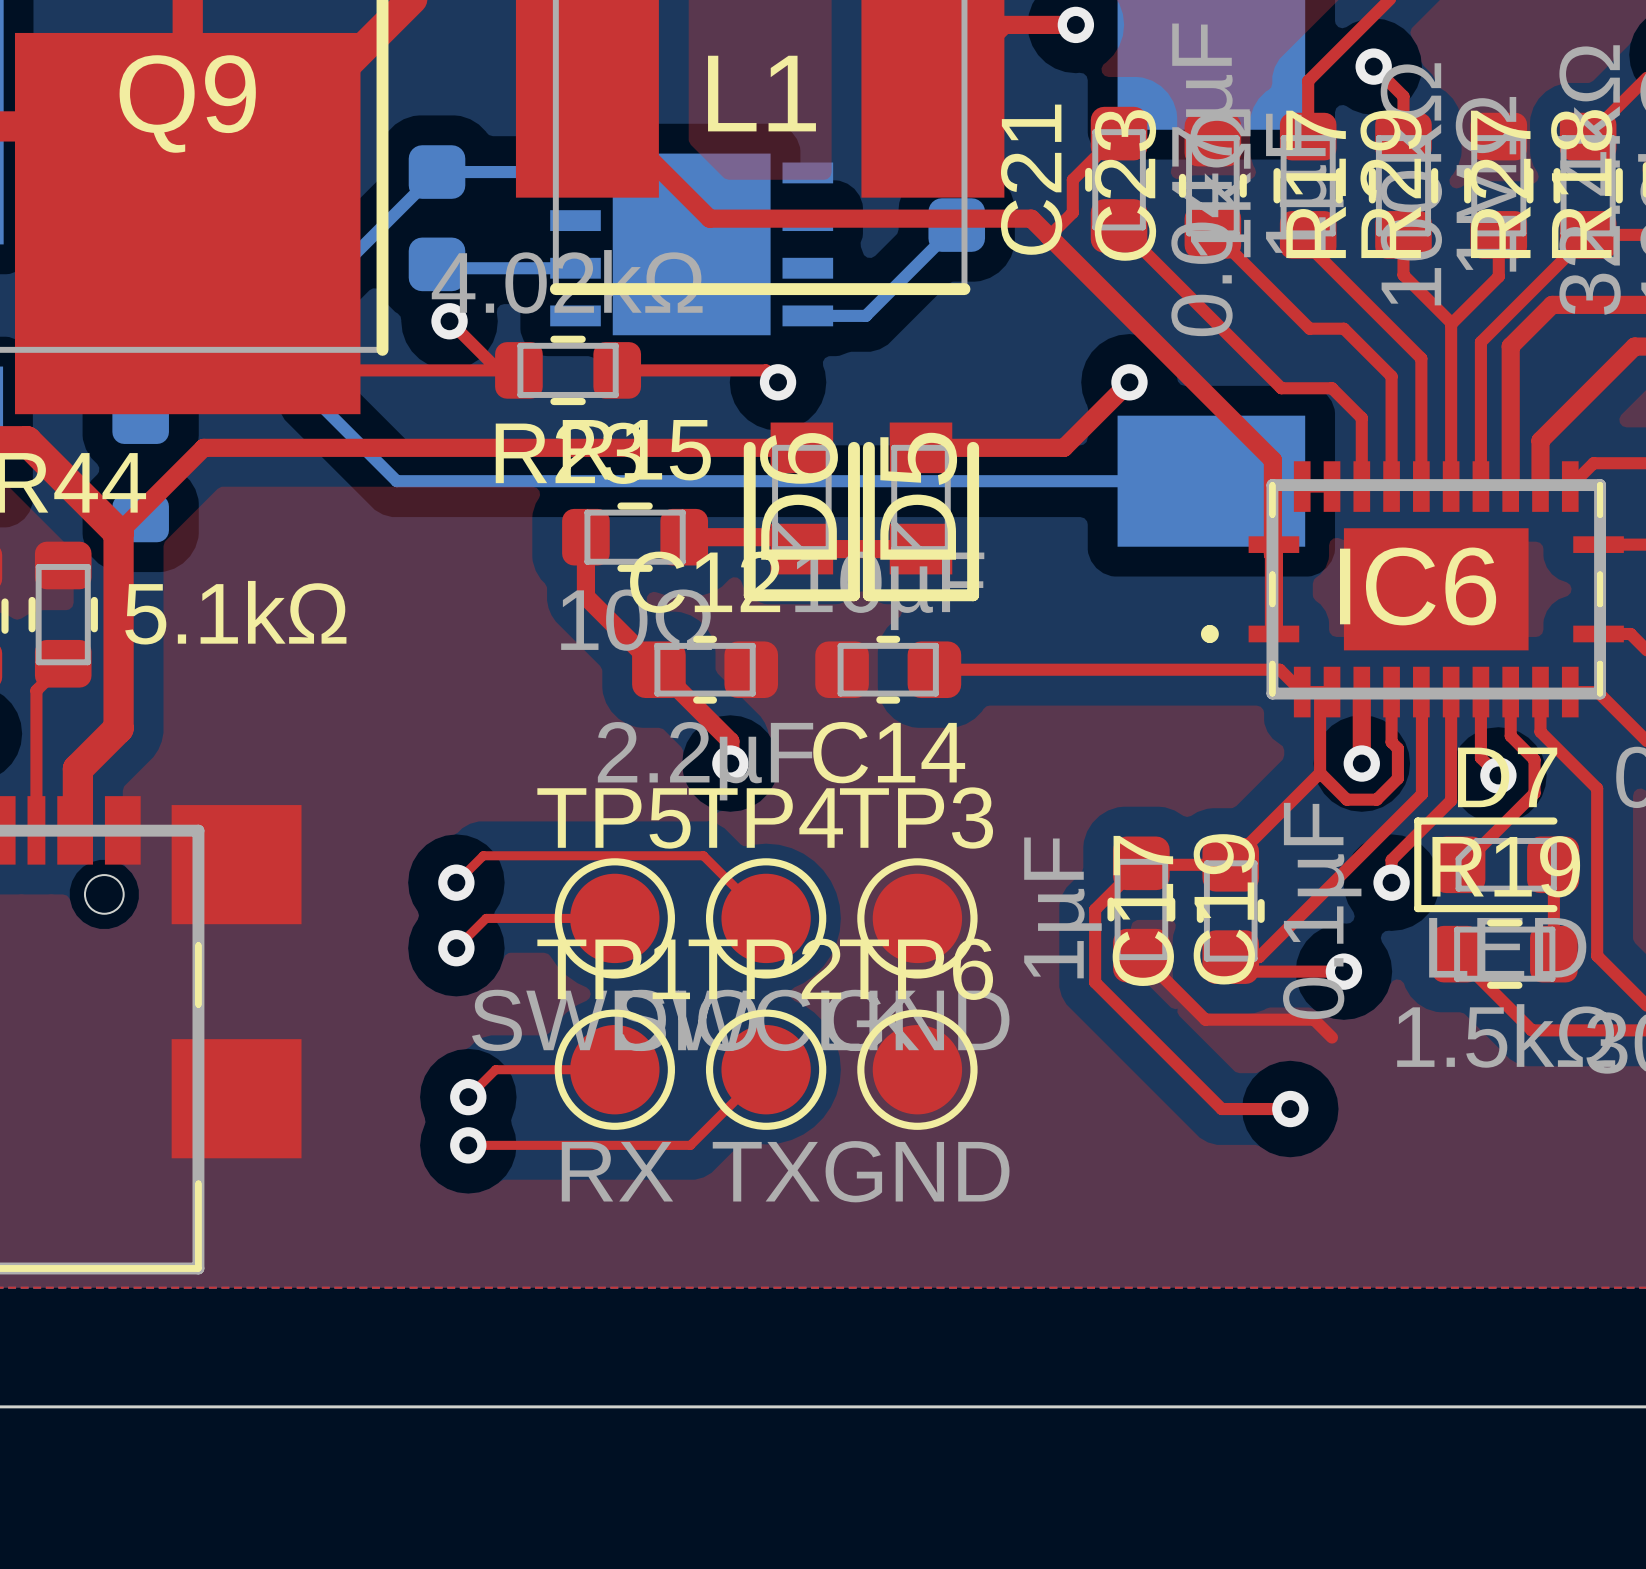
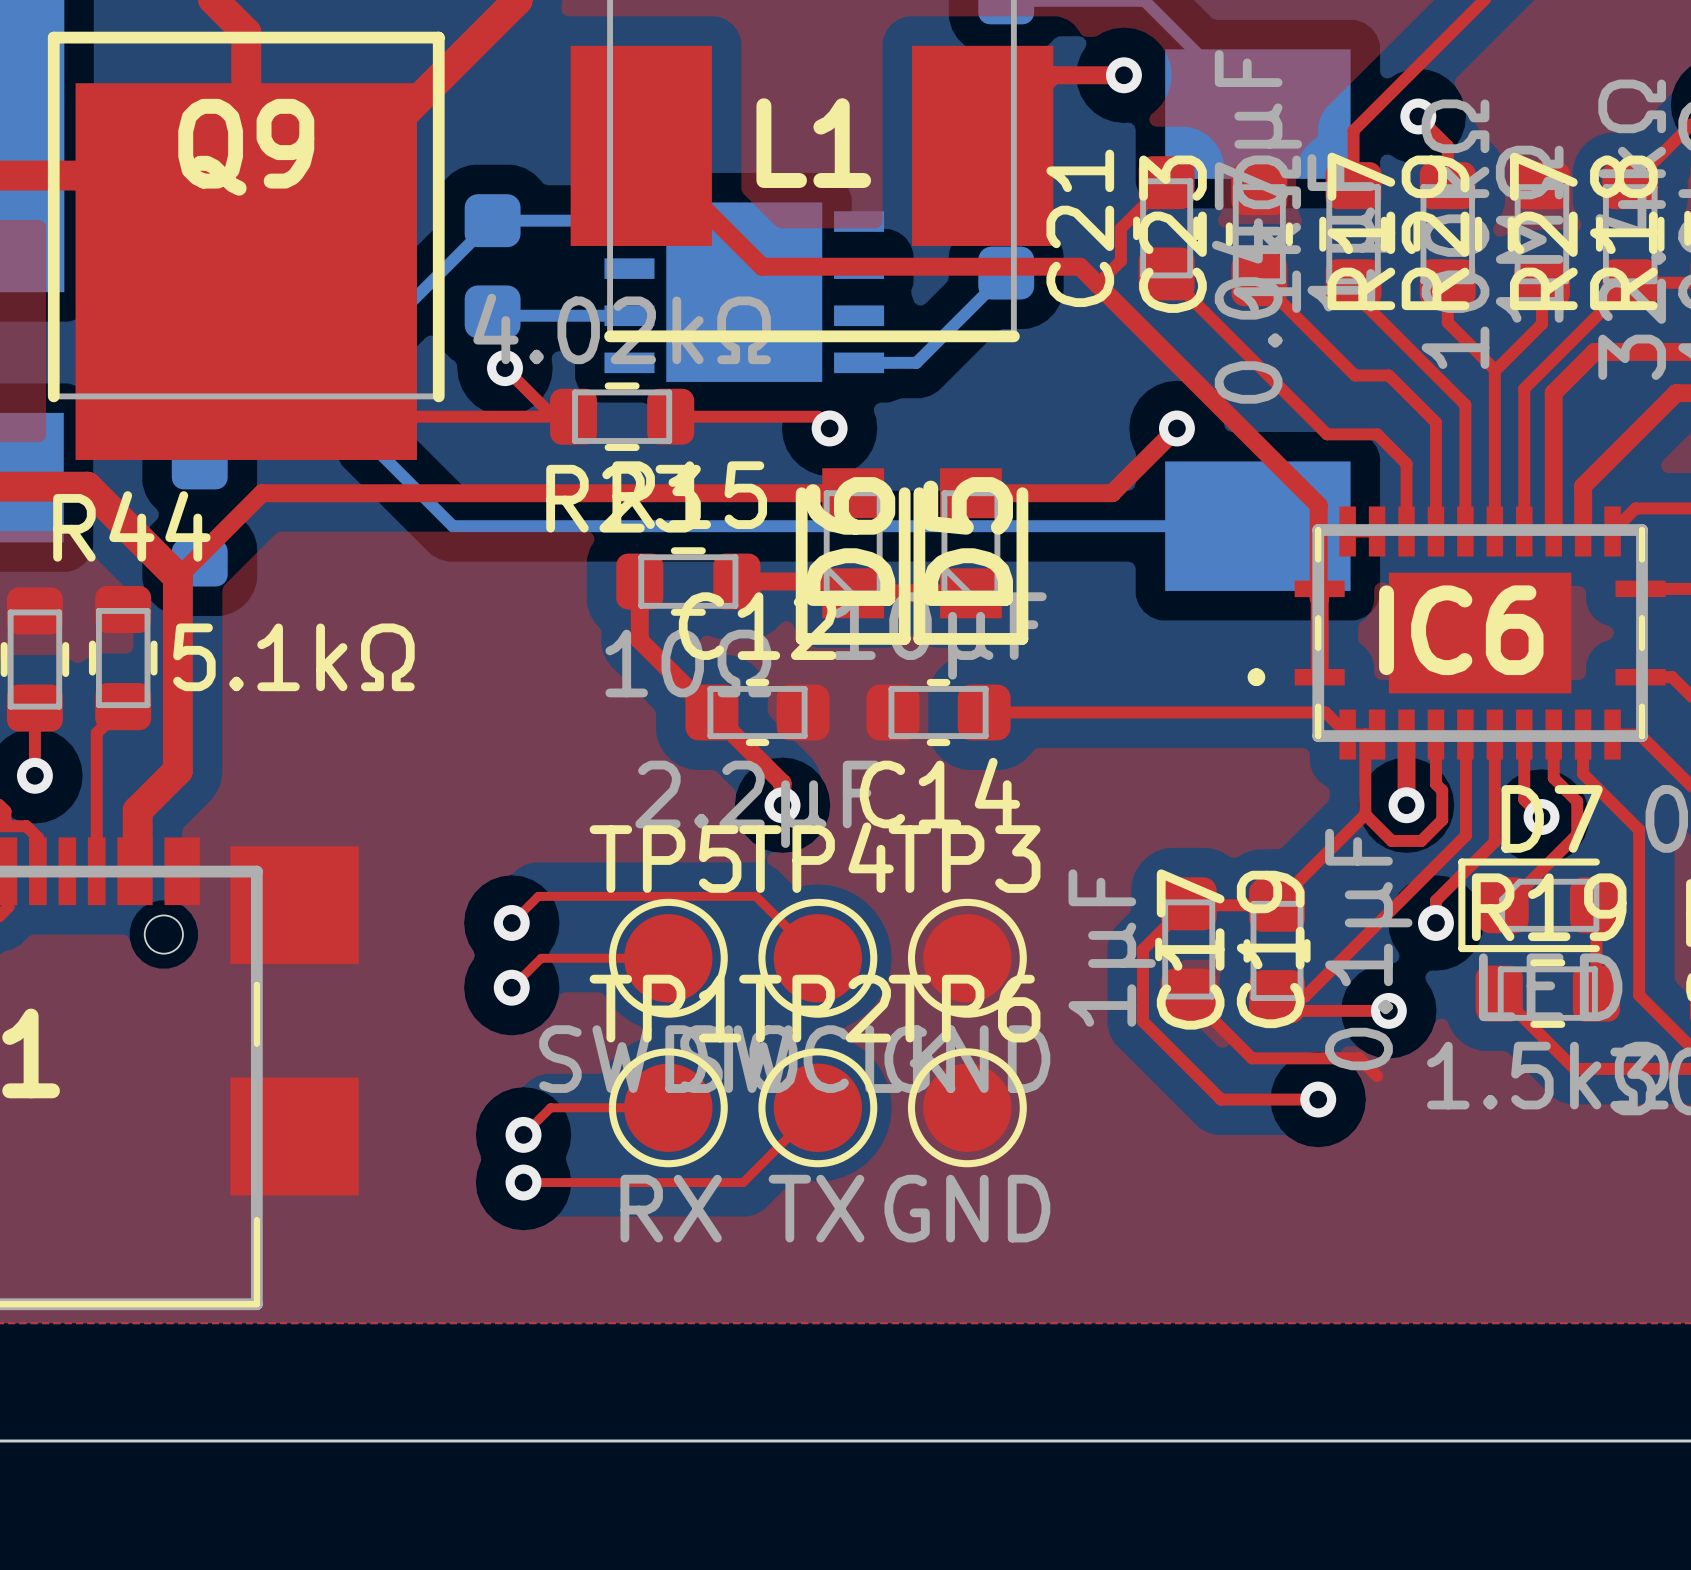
top track: (1174, 1061) (1221, 1109) (1290, 1109) -> (1221, 1099) (1318, 1099)
via position: (1290, 1109) -> (1318, 1099)

